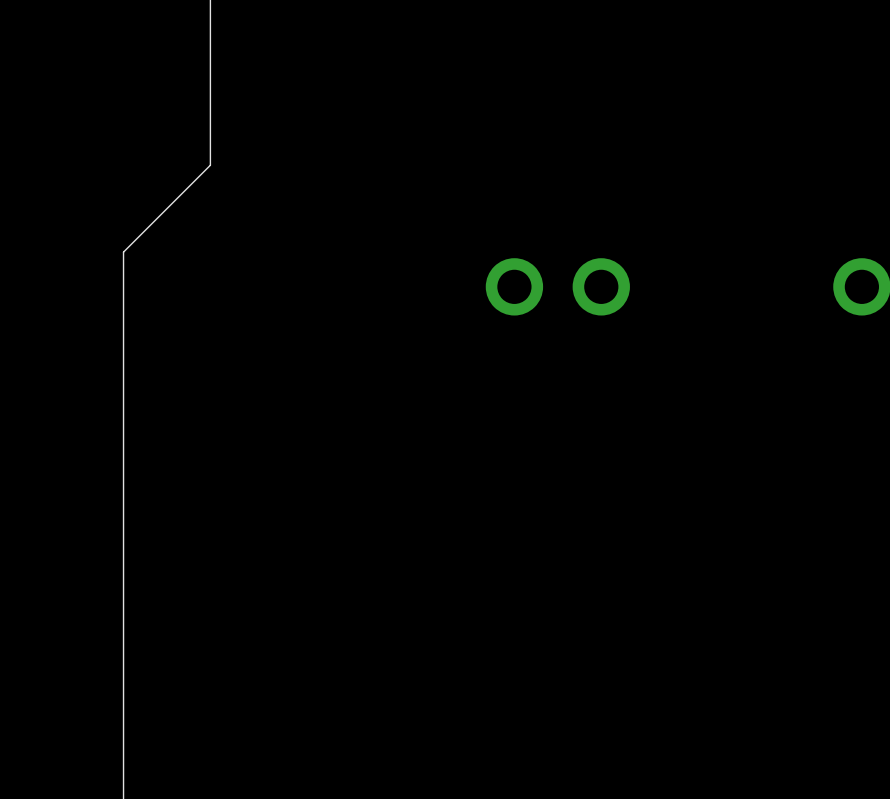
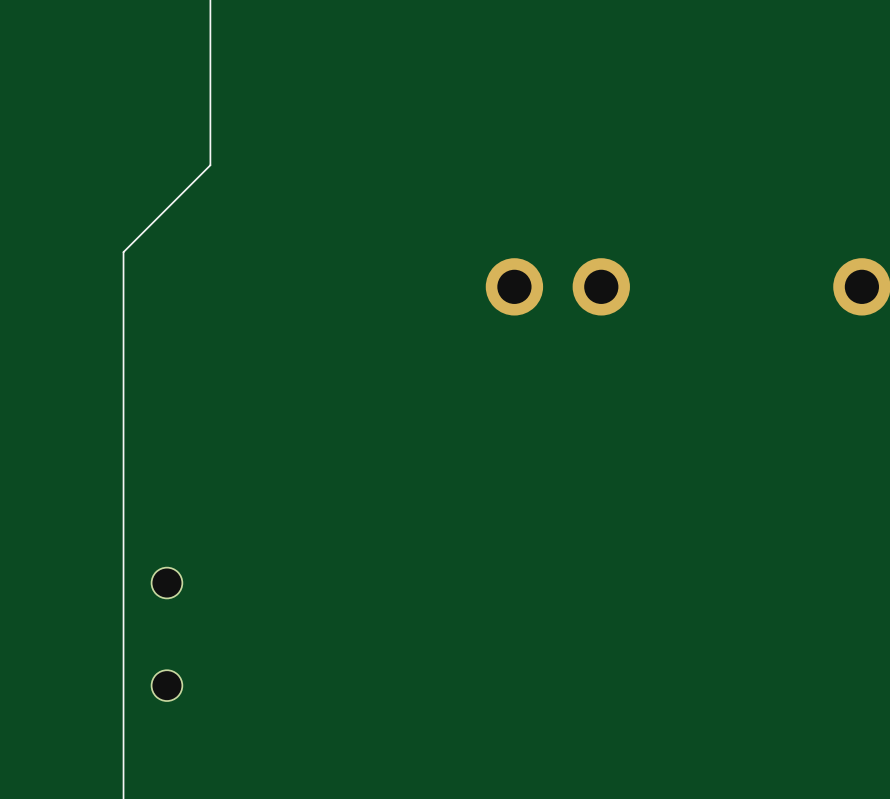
part: none -> (166, 634)

